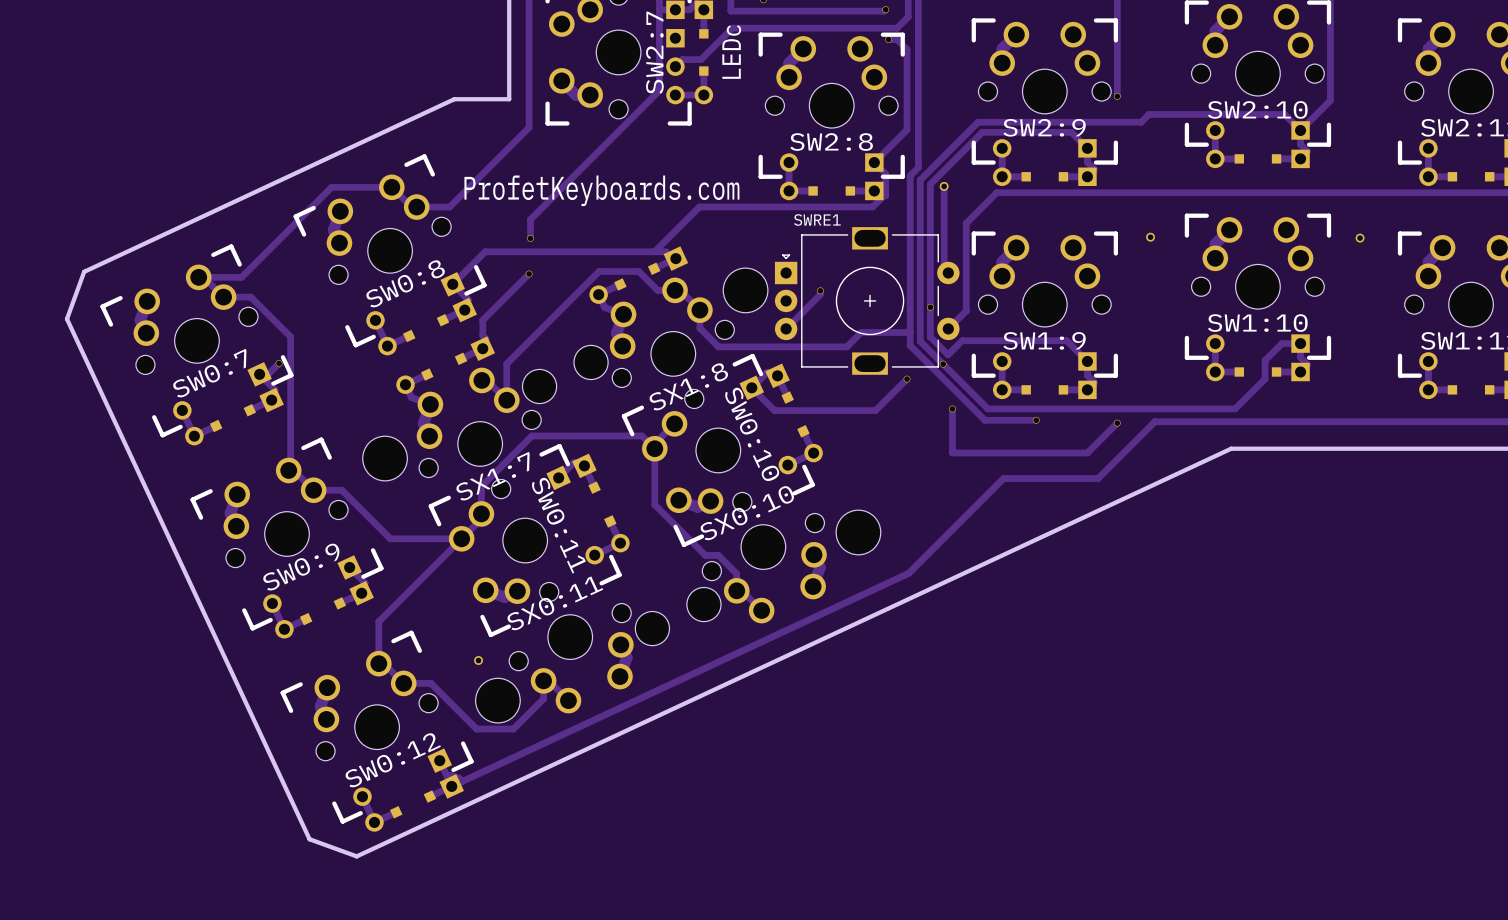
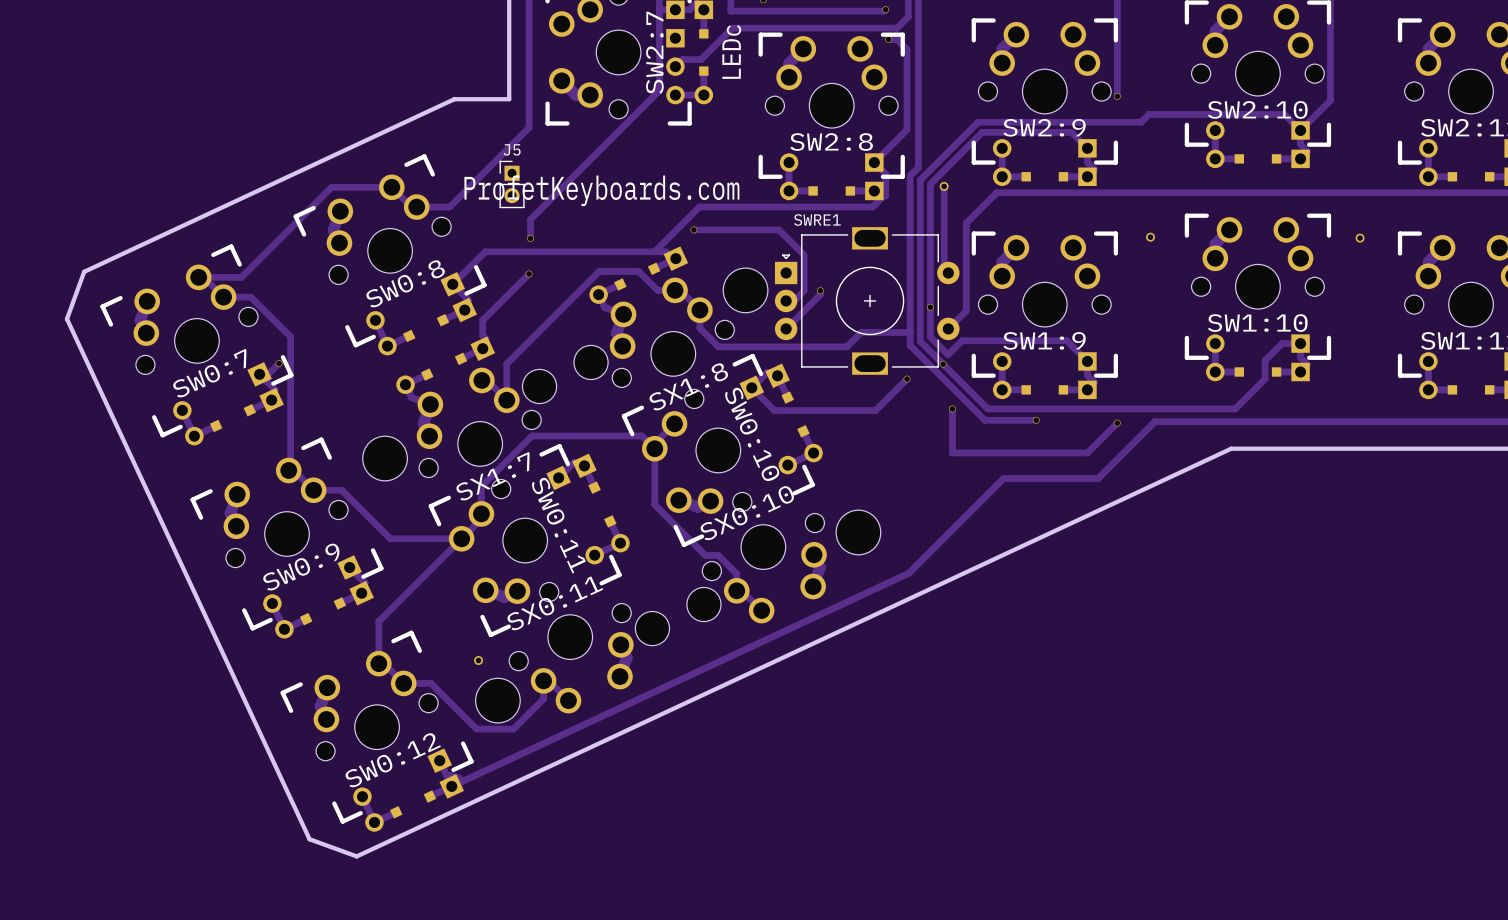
J5: none -> (512, 184)
track: none -> (693, 229) (778, 229) (804, 255) (804, 290) (794, 300) (786, 300)
via: none -> (693, 229)

